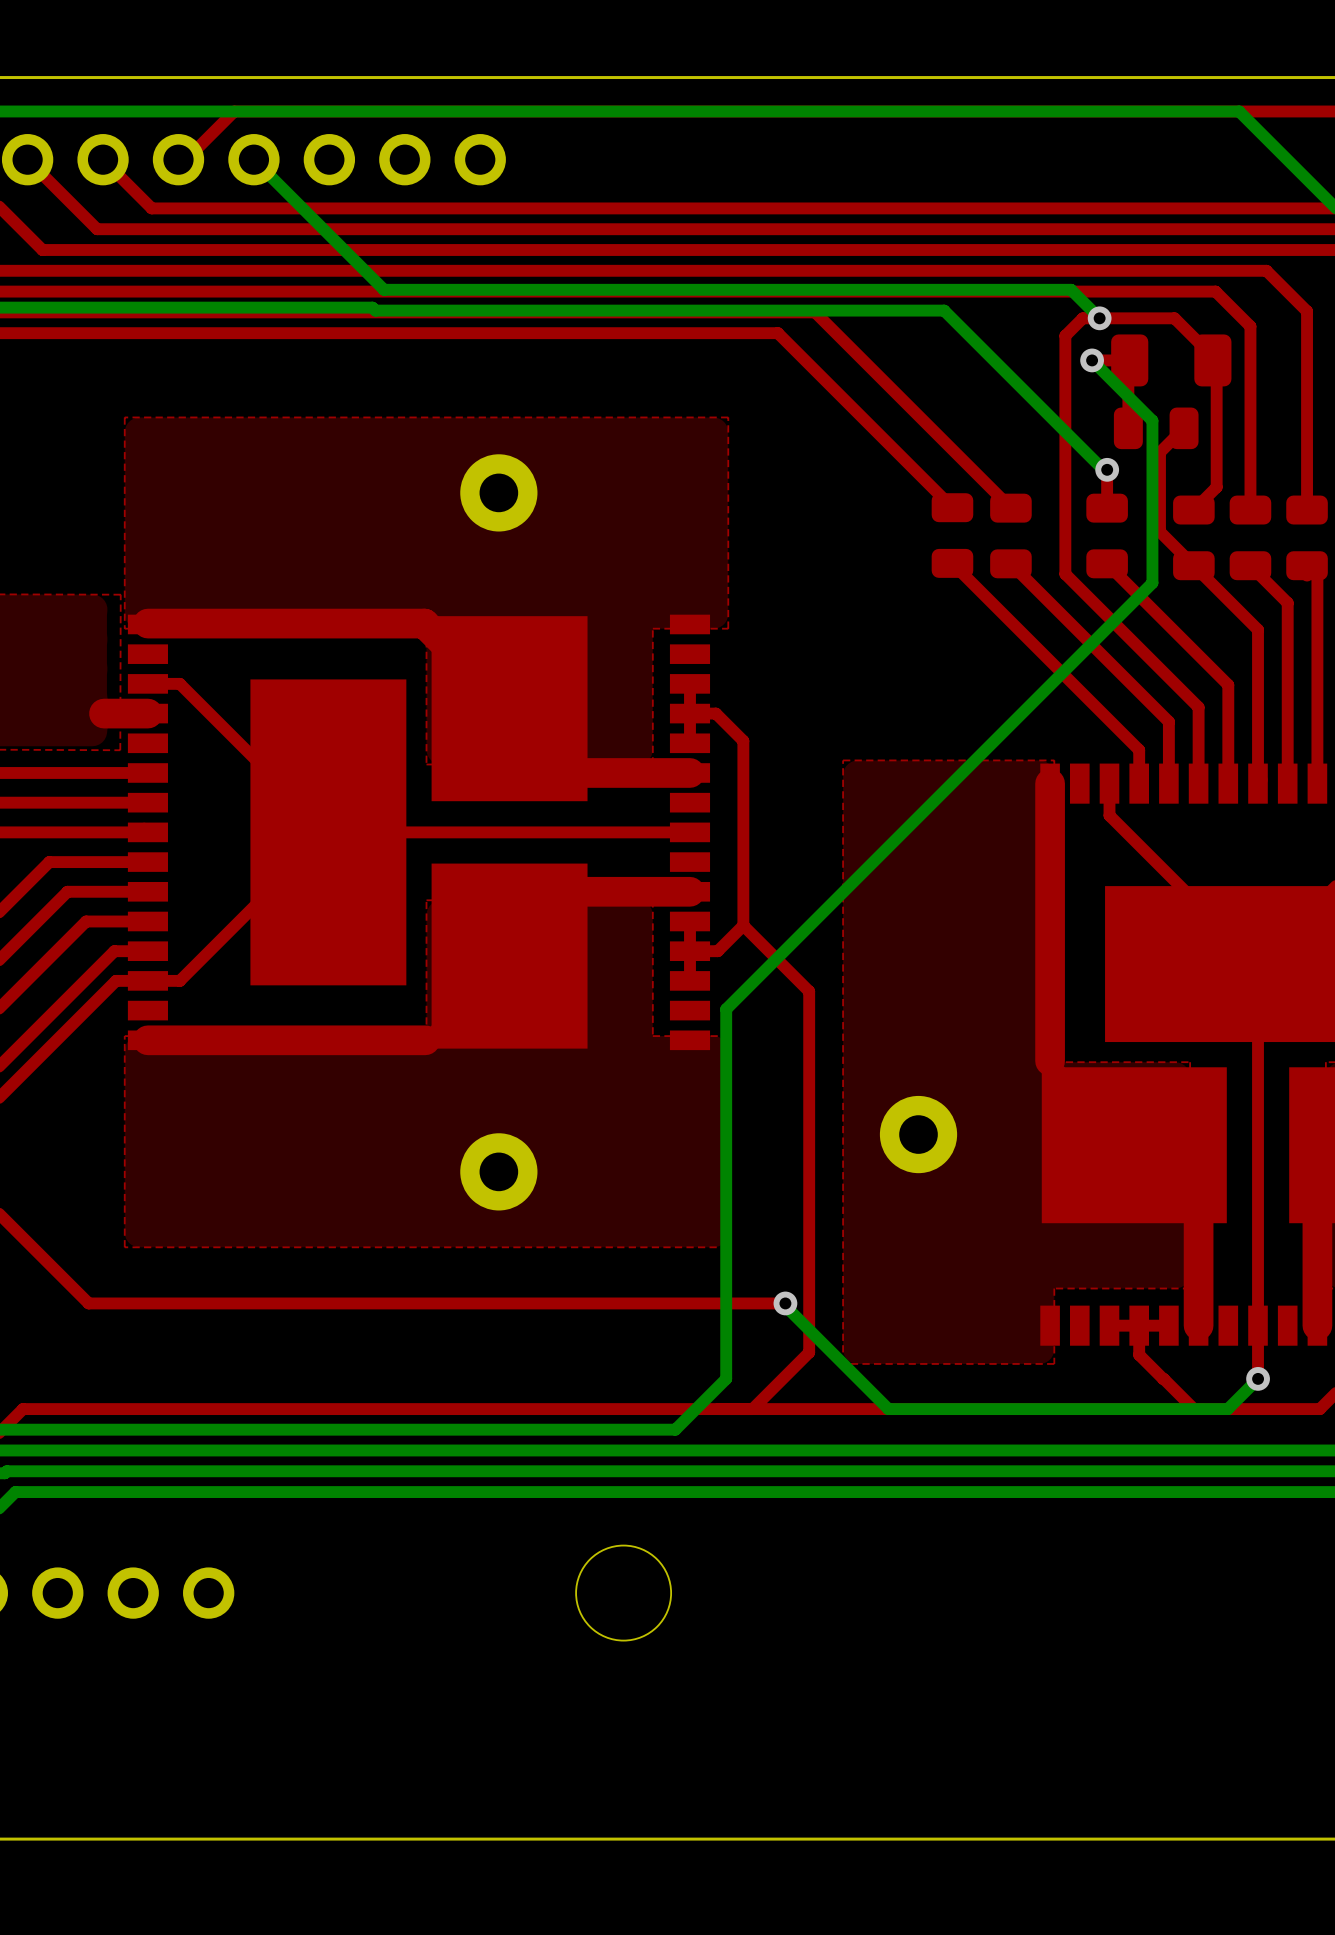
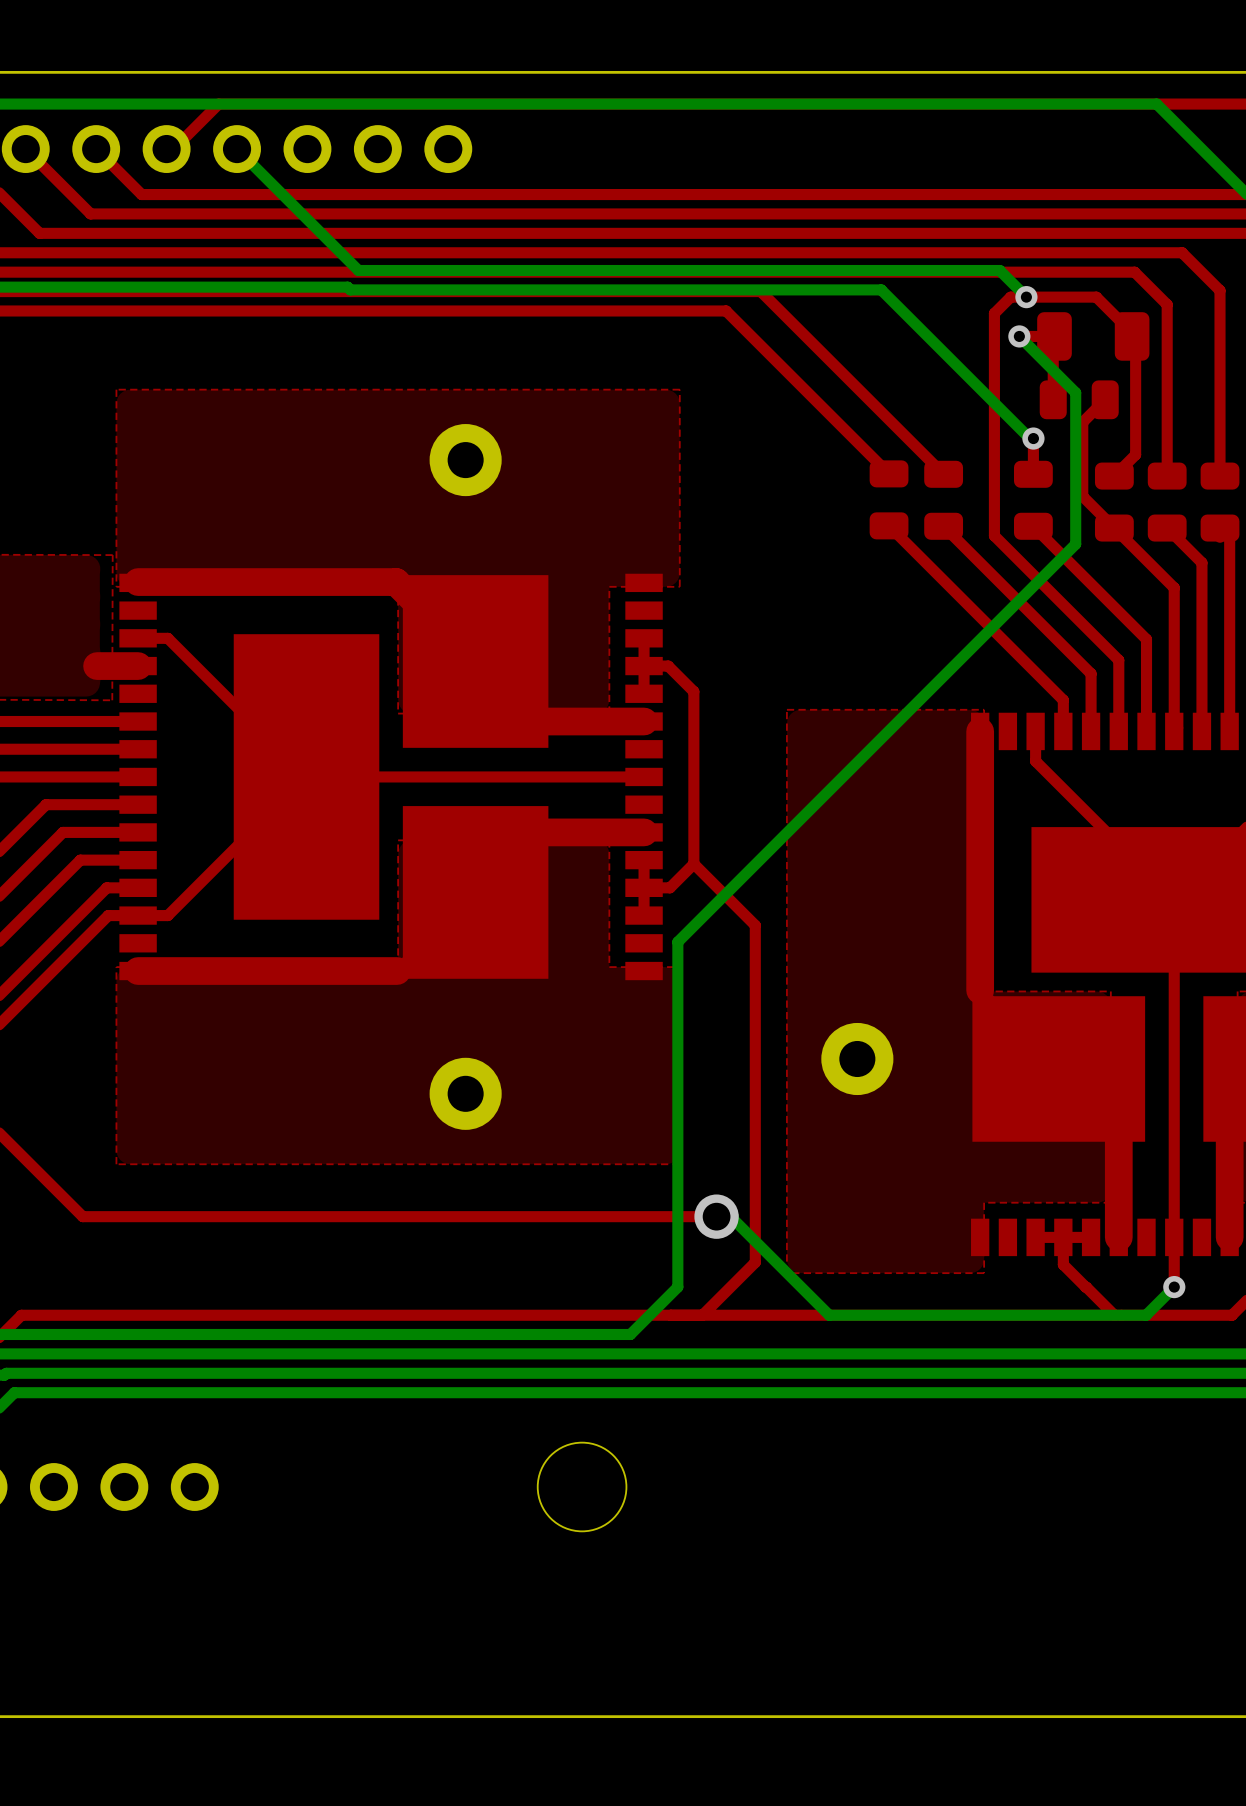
via size: [773, 1291, 798, 1316] -> [694, 1194, 739, 1239]

